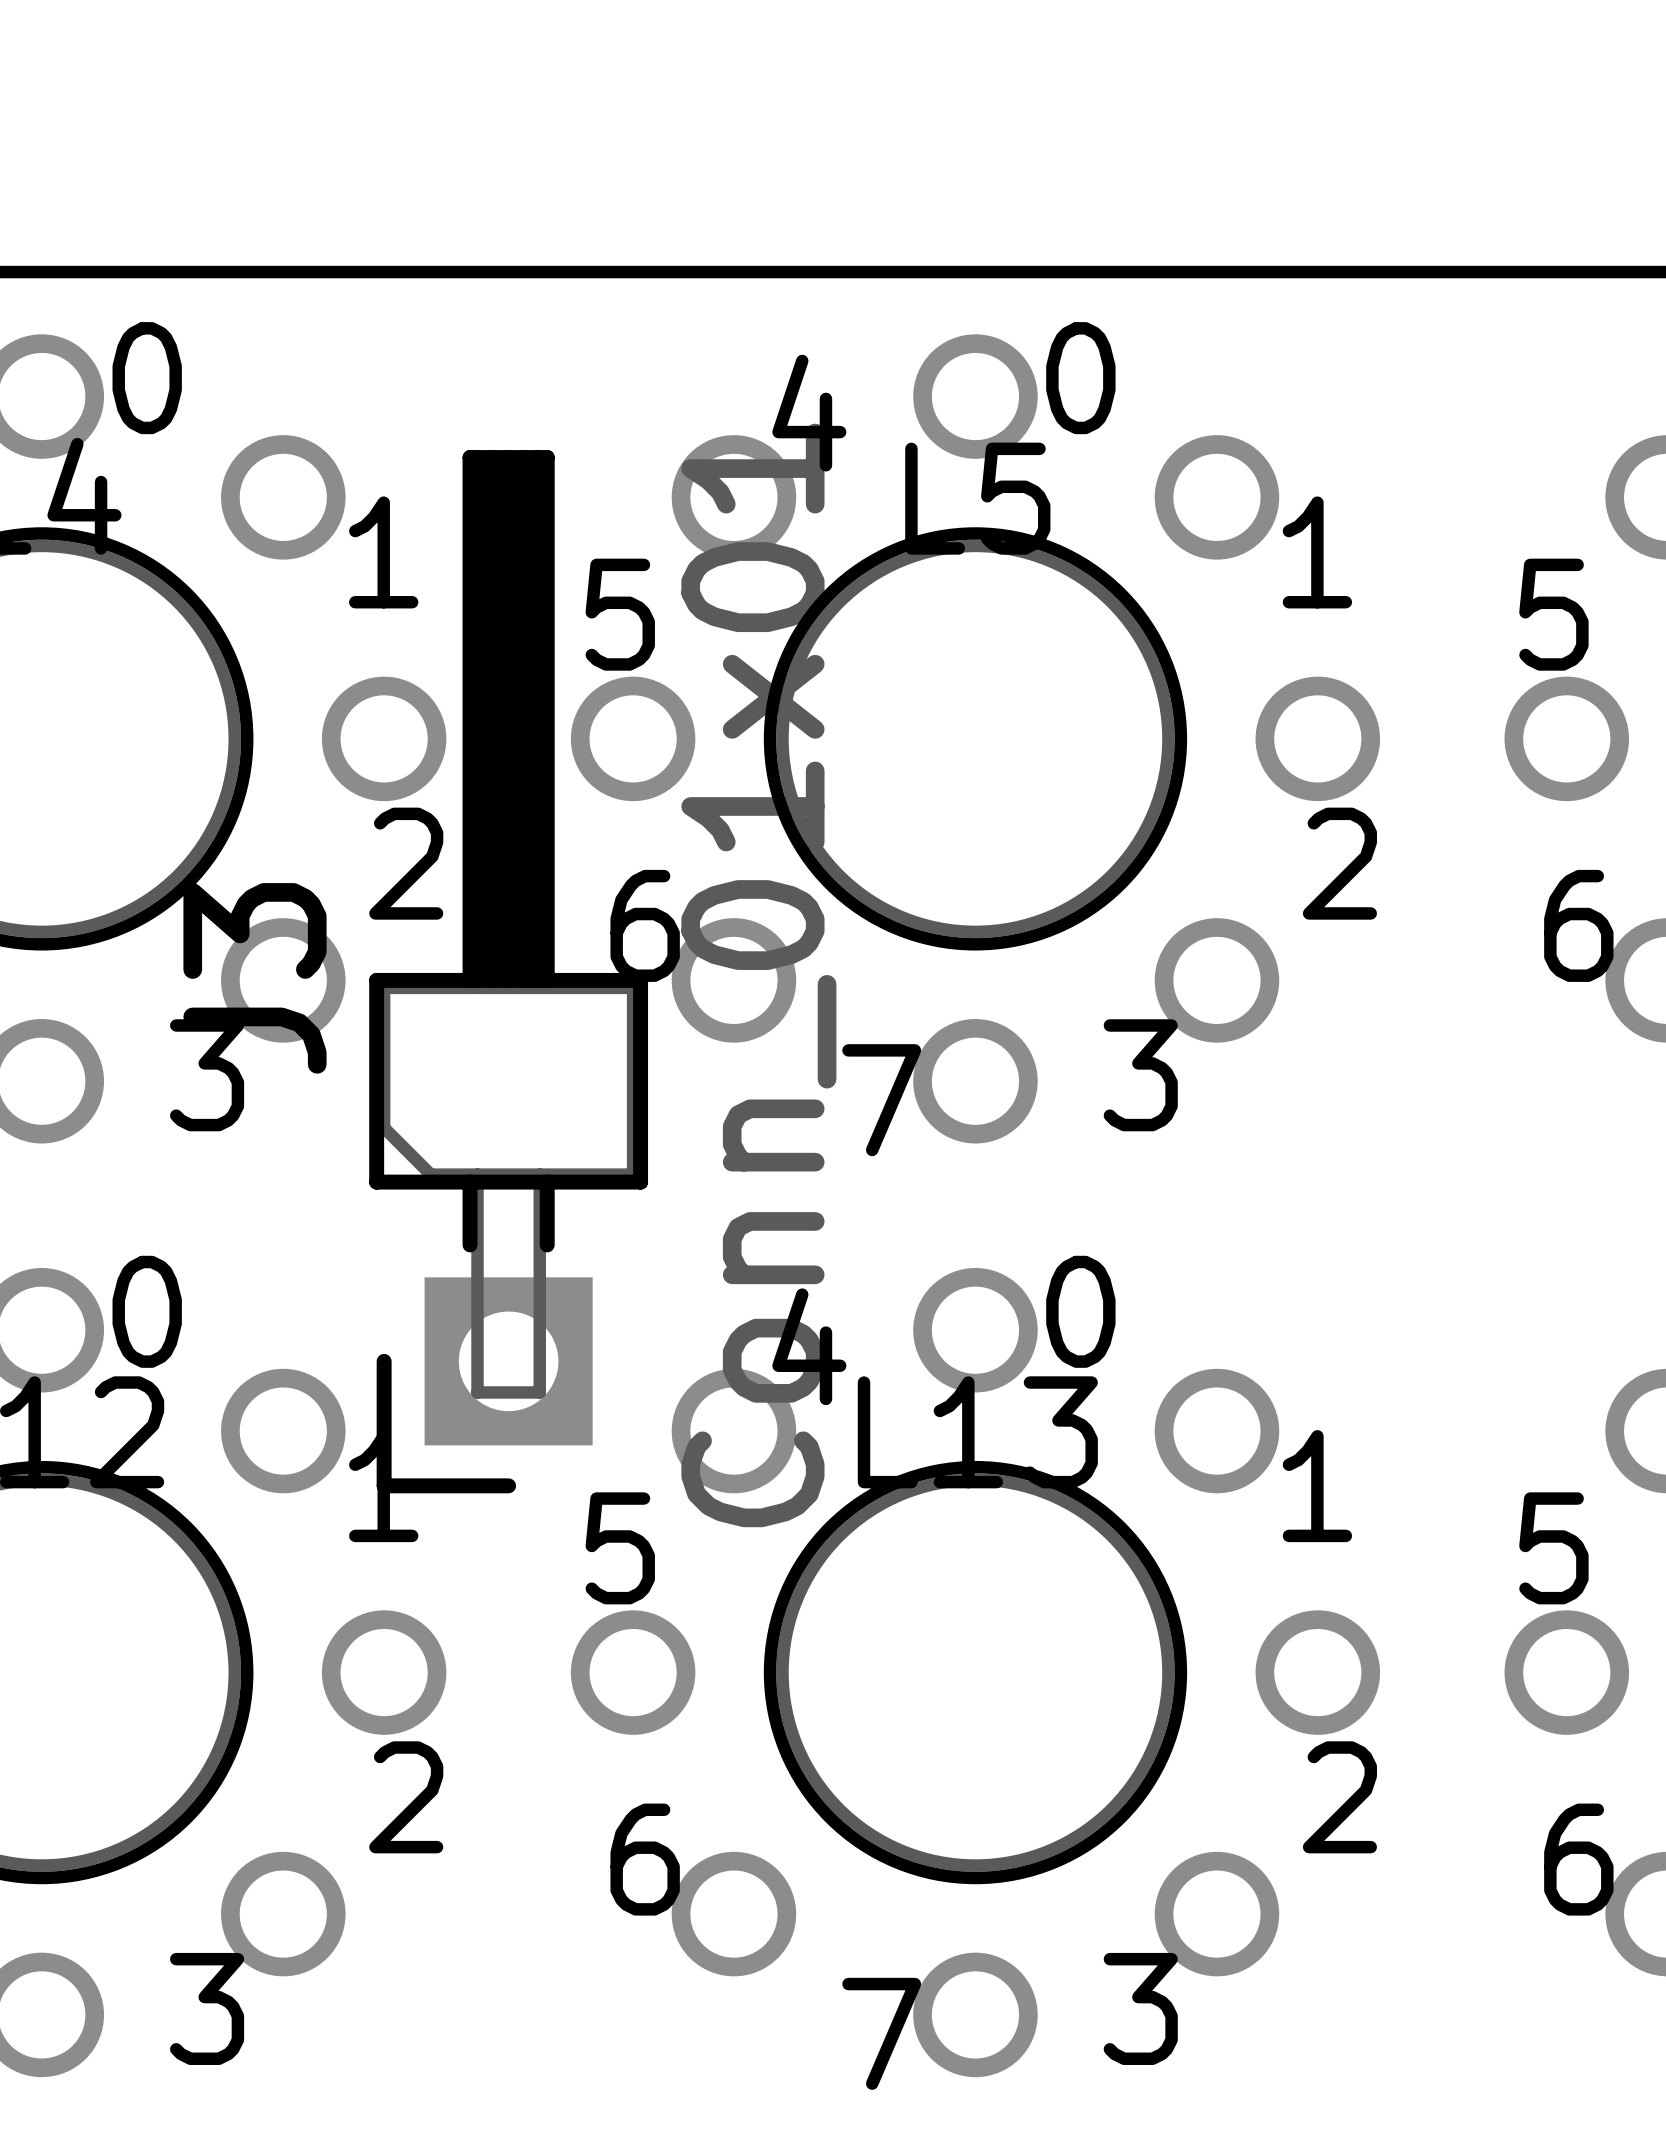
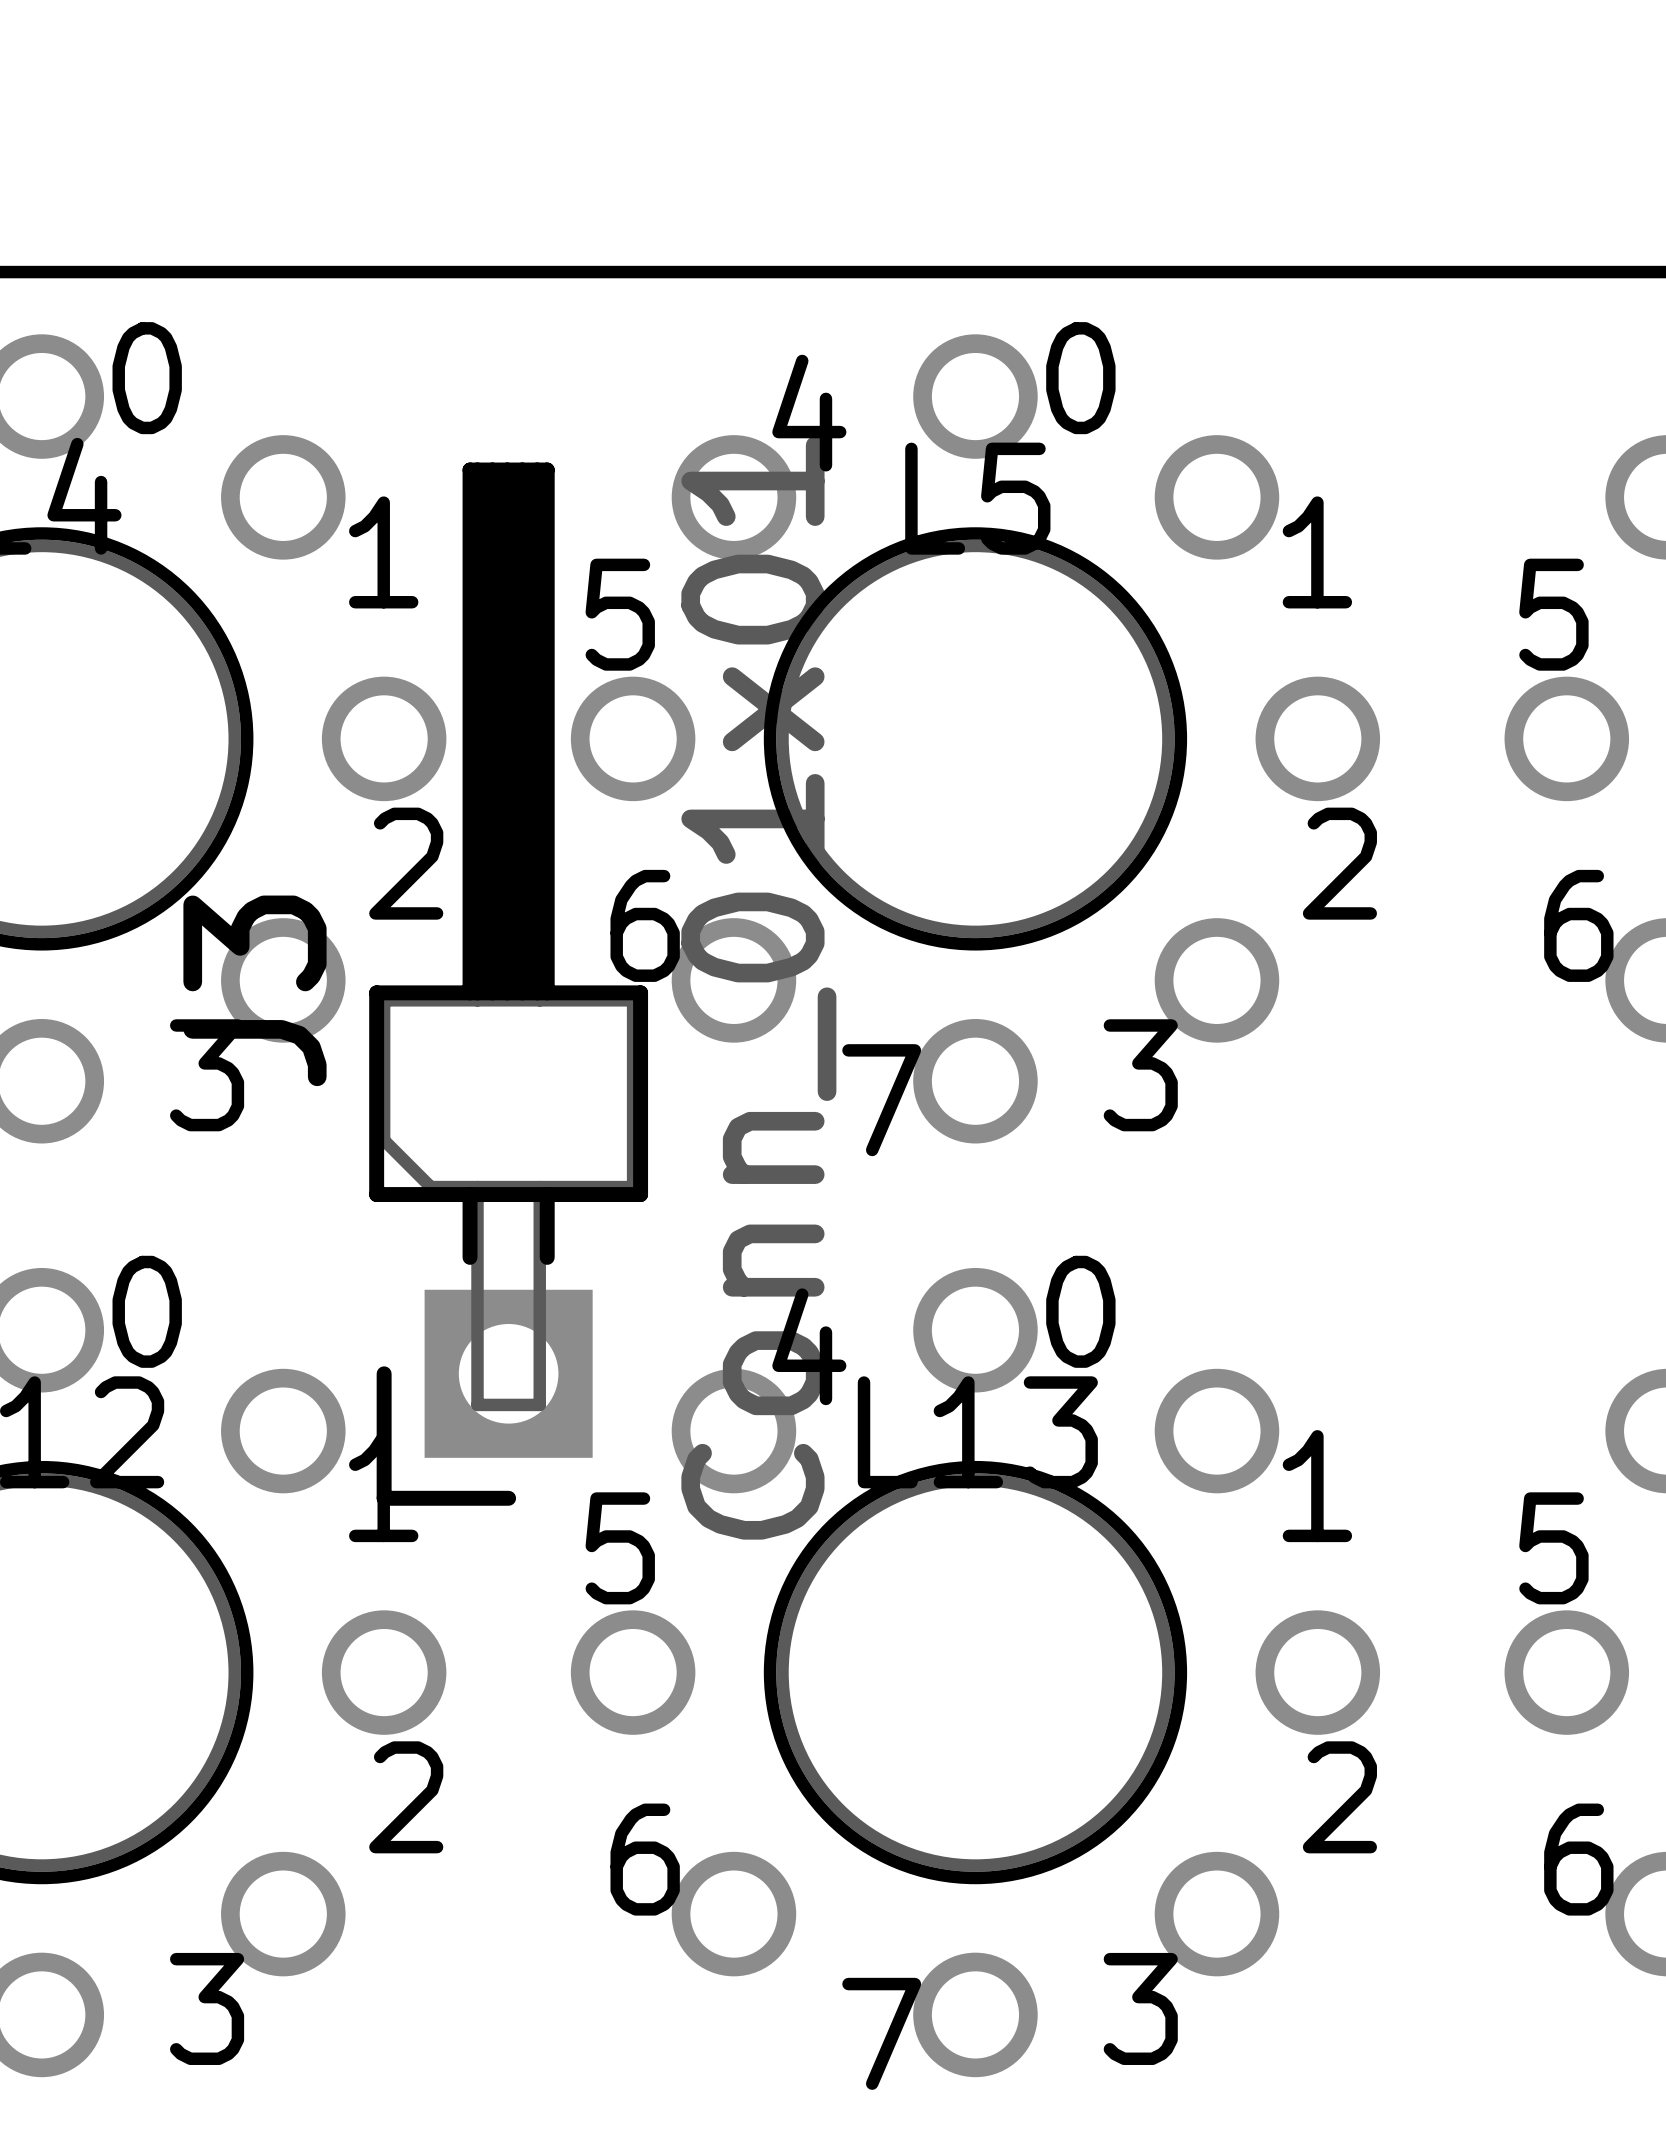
J3 position: (508, 971) -> (508, 984)

